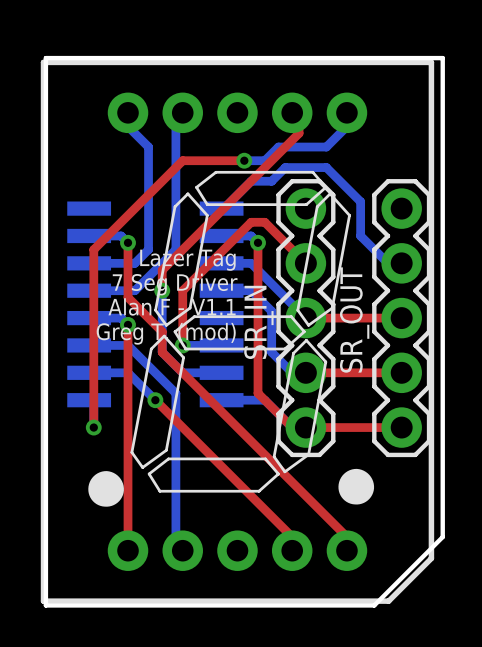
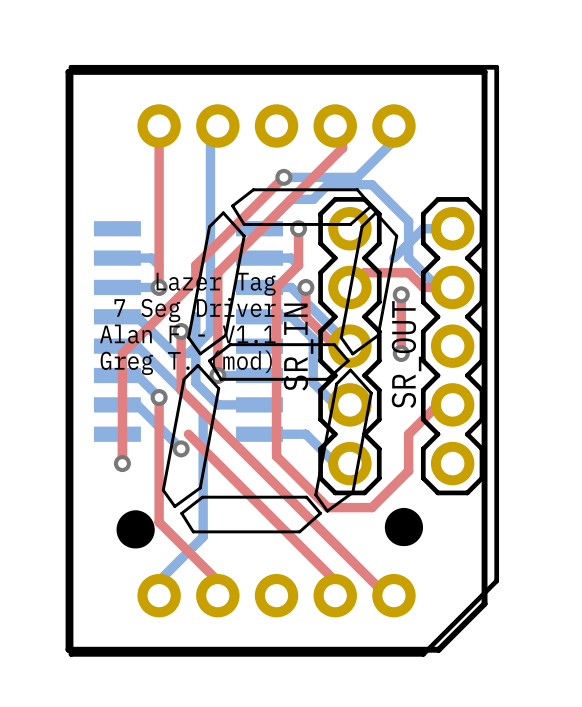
bottom track: (128, 112) (128, 126) (148, 147) (148, 249) (134, 263) (128, 263) -> none
top track: none -> (159, 126) (159, 265)
bottom track: (326, 147) (278, 147) (264, 160) -> (371, 162) (357, 177) (305, 177)
top track: (244, 160) (182, 160) (93, 249) (93, 324) -> (283, 177) (195, 265) (195, 280) (122, 353)
via: none -> (298, 228)
bottom track: none -> (452, 228) (423, 228) (393, 258)
via position: (128, 242) -> (159, 287)
top track: (258, 242) (258, 393) (292, 427) (401, 427) -> none
via: (258, 242) -> none
bottom track: (175, 249) (134, 290) (107, 290) -> (210, 272) (210, 331) (188, 353) (173, 353) (137, 316)
top track: (182, 249) (162, 270) (162, 290) -> (217, 272) (217, 316)
top track: (128, 263) (128, 297) (162, 331) (162, 352) (346, 537) (346, 550) -> (181, 331) (181, 390) (386, 595) (393, 595)
via: none -> (305, 287)
top track: (305, 263) (264, 222) (251, 222) (182, 290) -> (349, 287) (364, 272) (408, 272) (423, 287) (452, 287)
top track: none -> (401, 294) (401, 353)
via: none -> (401, 294)
via position: (162, 290) -> (181, 331)
bottom track: (107, 318) (121, 318) (128, 324) -> (137, 346) (203, 412) (203, 536) (159, 580) (159, 595)
top track: (305, 318) (401, 318) -> (349, 346) (335, 346) (305, 316) (305, 287)
SR_OUT name position: SR_OUT (354, 320) -> SR_OUT (406, 354)
top track: (128, 324) (128, 365) -> none
via: (128, 324) -> none
via: none -> (401, 353)
bottom track: (107, 345) (128, 345) (175, 393) (175, 543) (182, 550) -> (137, 375) (159, 397)
via: none -> (159, 397)
bottom track: (107, 372) (128, 372) (155, 400) -> (137, 404) (181, 448)
top track: (305, 372) (388, 372) -> (298, 228) (298, 265) (276, 287) (276, 456) (327, 507) (371, 507) (408, 470) (408, 434) (437, 404)
via position: (155, 400) -> (181, 448)
top track: (128, 482) (128, 550) -> (159, 522) (217, 580) (217, 595)

